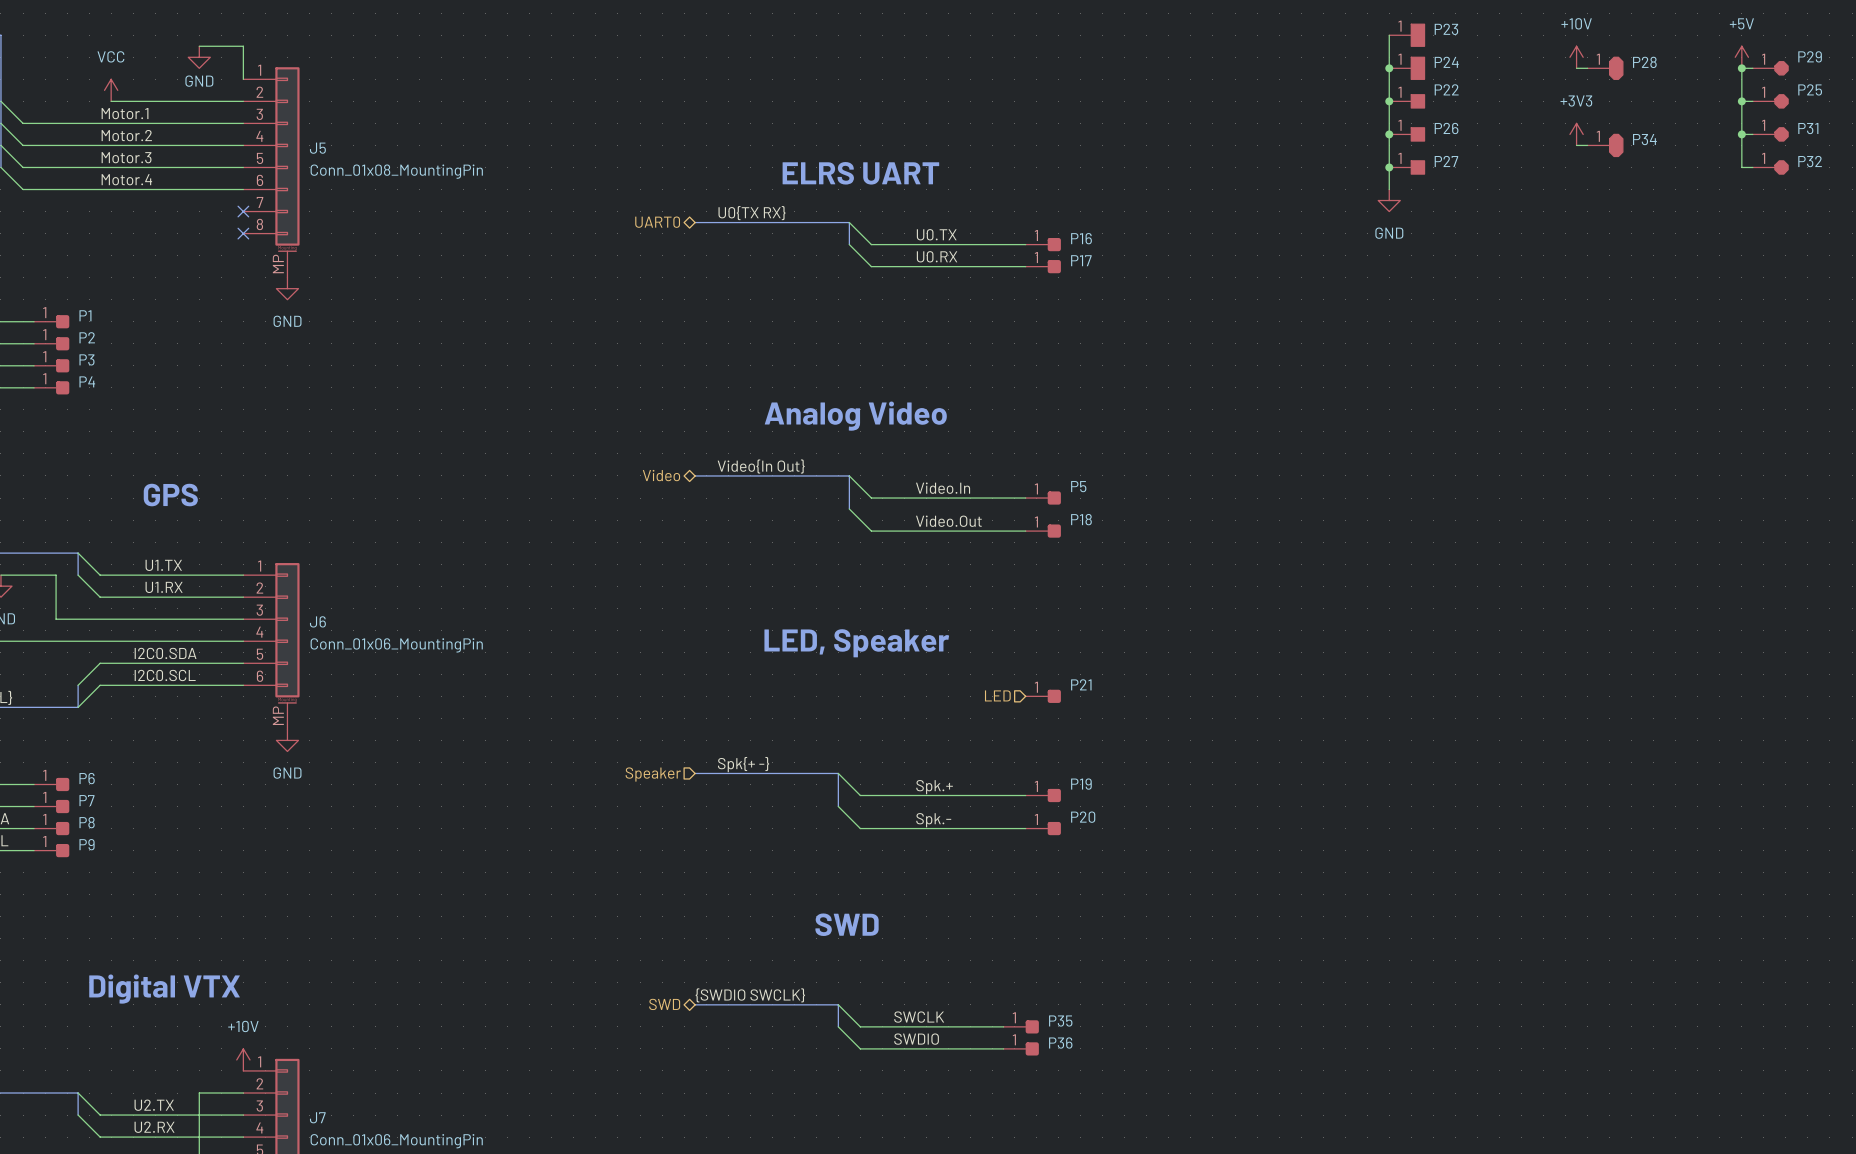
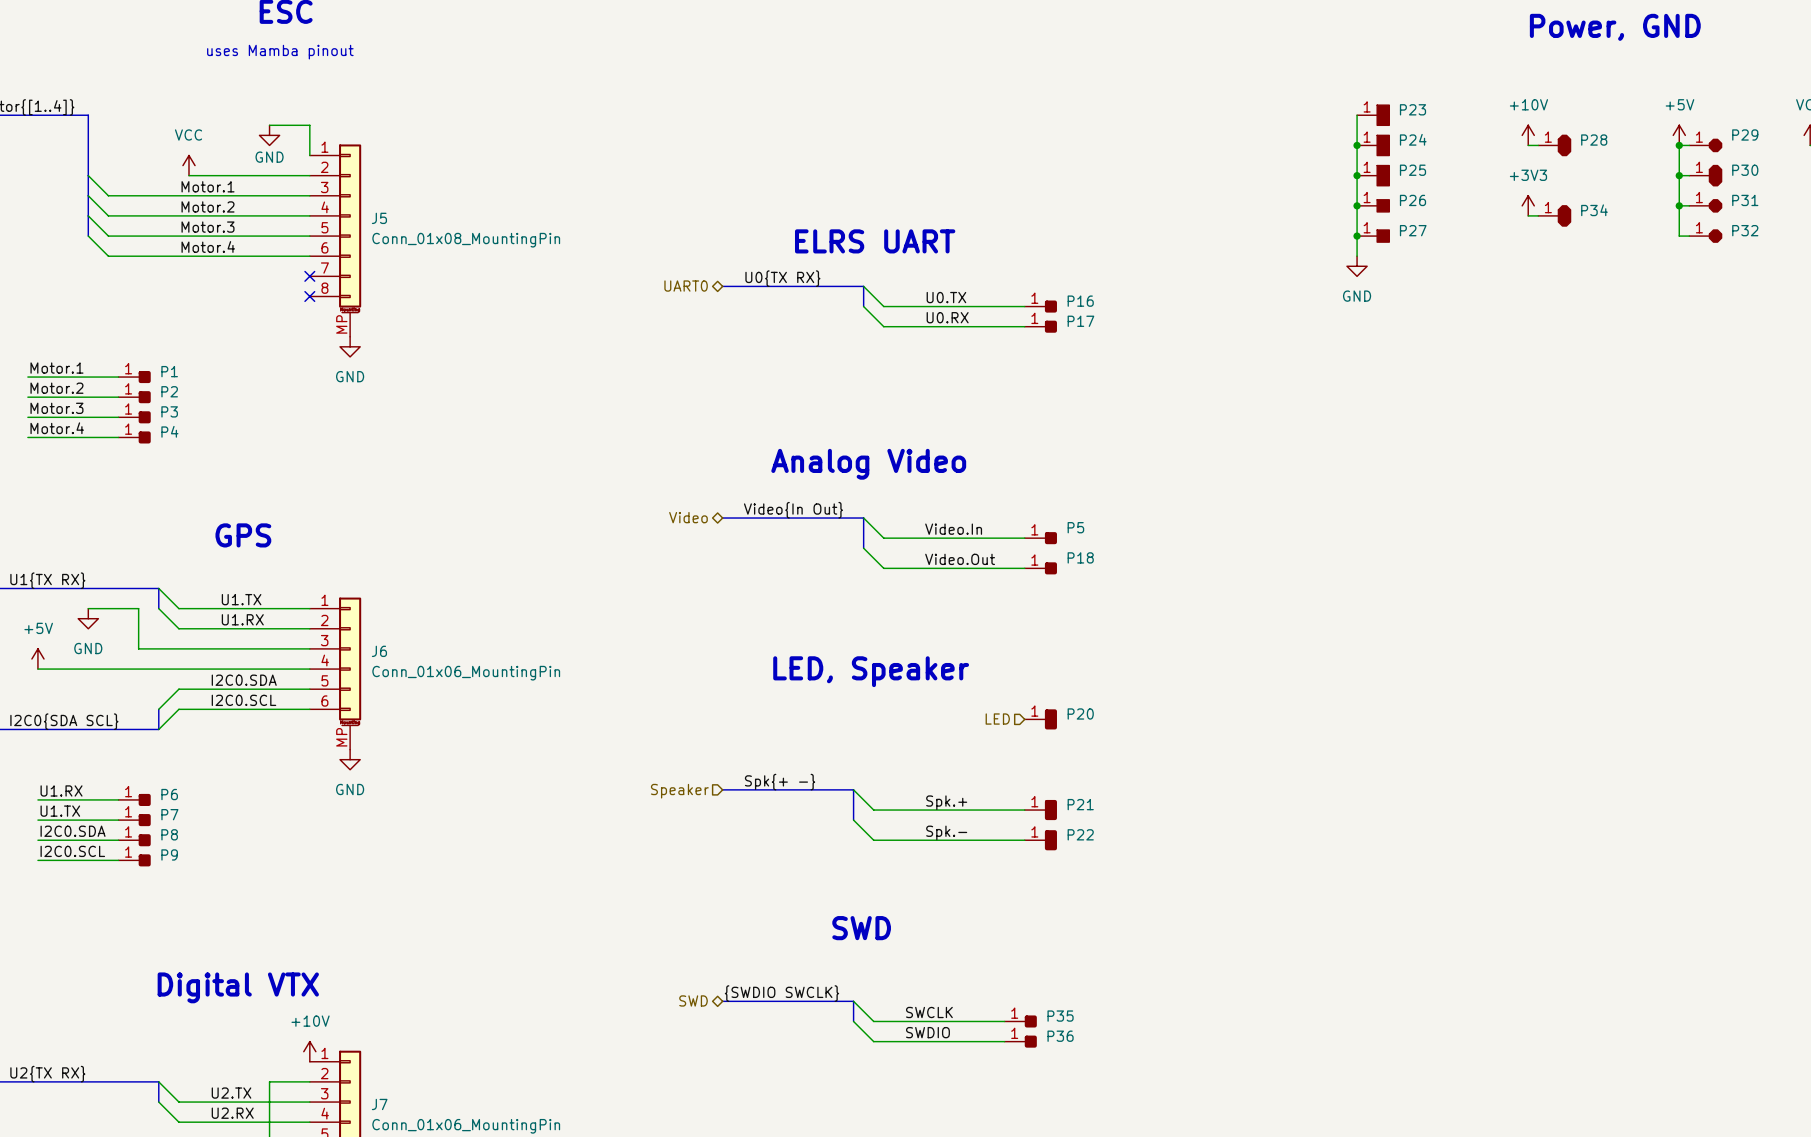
P22 symbol: [1389, 94, 1425, 108] -> [1024, 830, 1057, 851]
P25 symbol: [1752, 94, 1789, 108] -> [1357, 165, 1390, 186]
P30: none -> (1705, 175)
P21 symbol: [1025, 689, 1061, 703] -> [1024, 799, 1057, 821]
P19: (1043, 795) -> none
P20 symbol: [1025, 821, 1061, 836] -> [1024, 709, 1057, 730]

